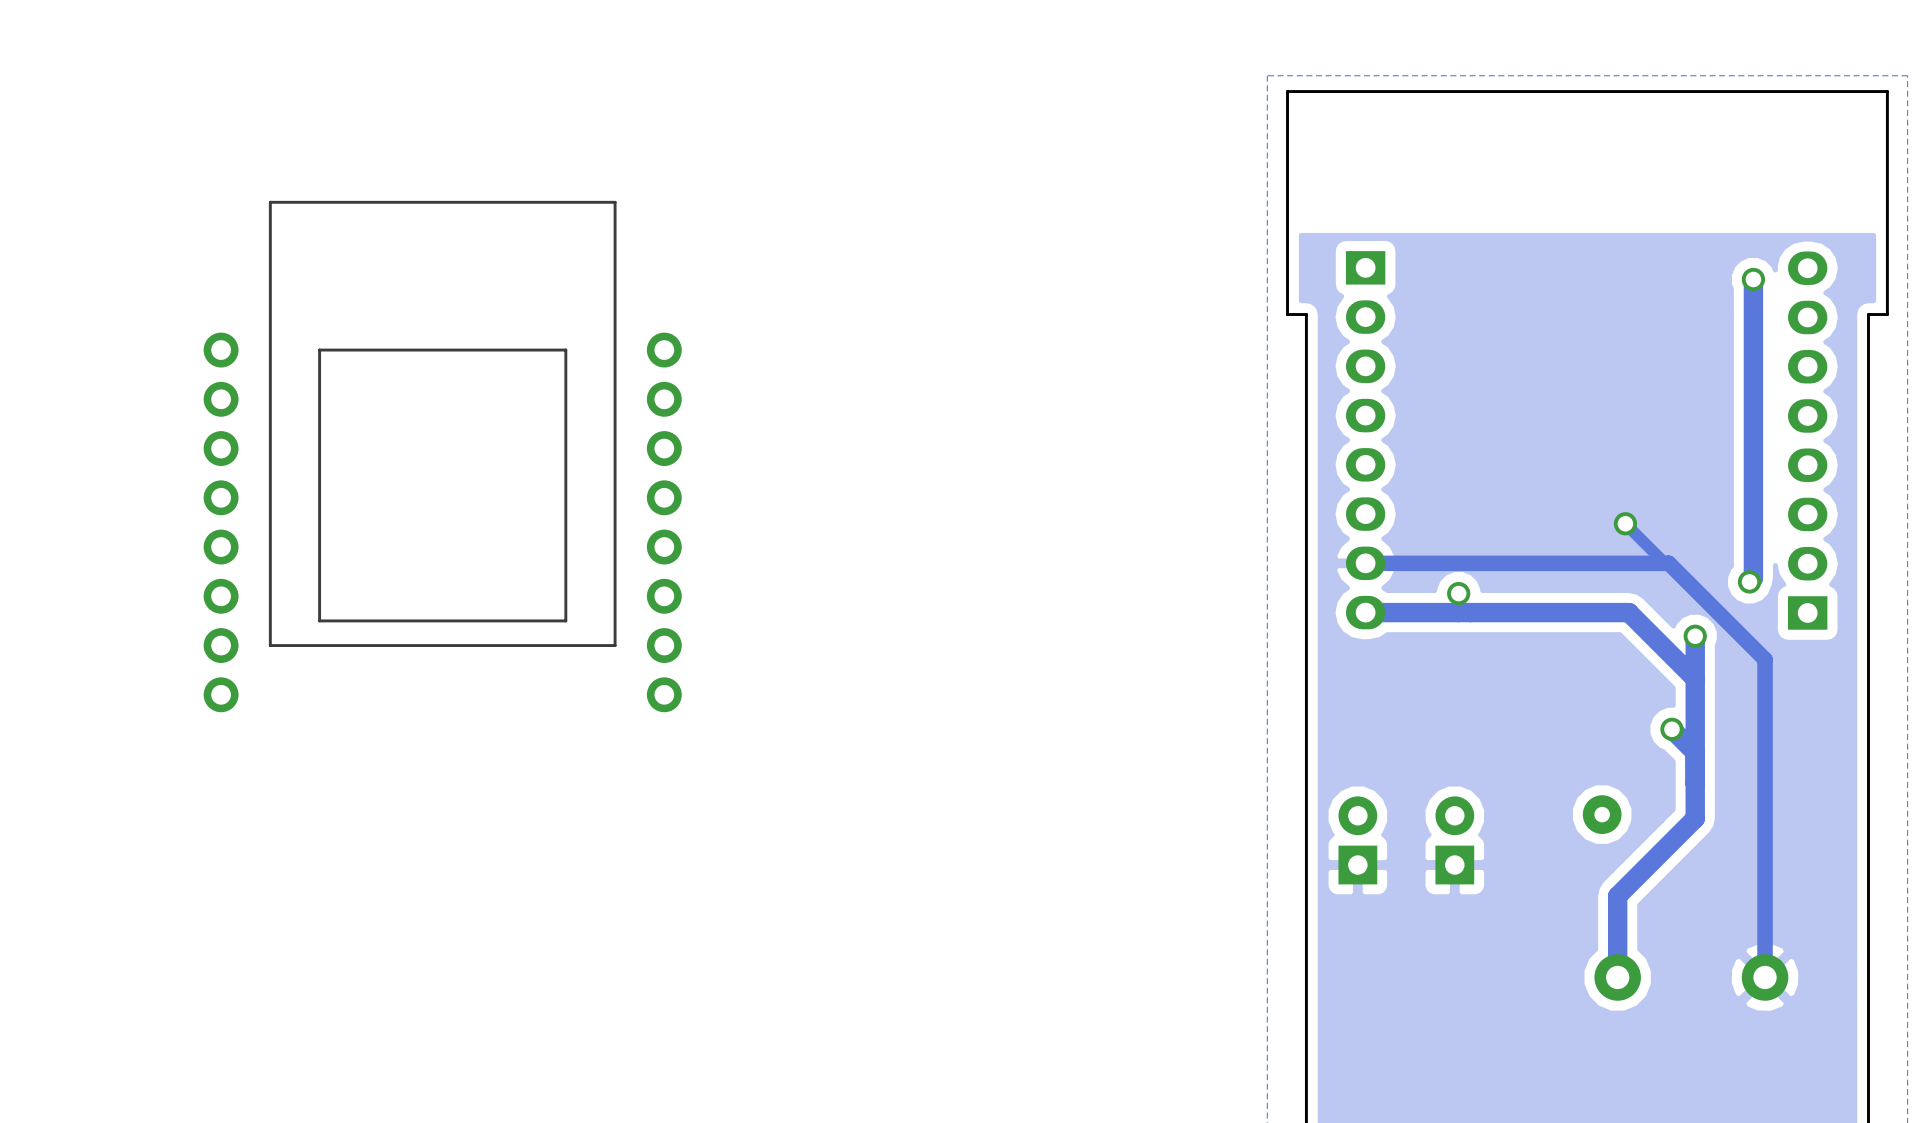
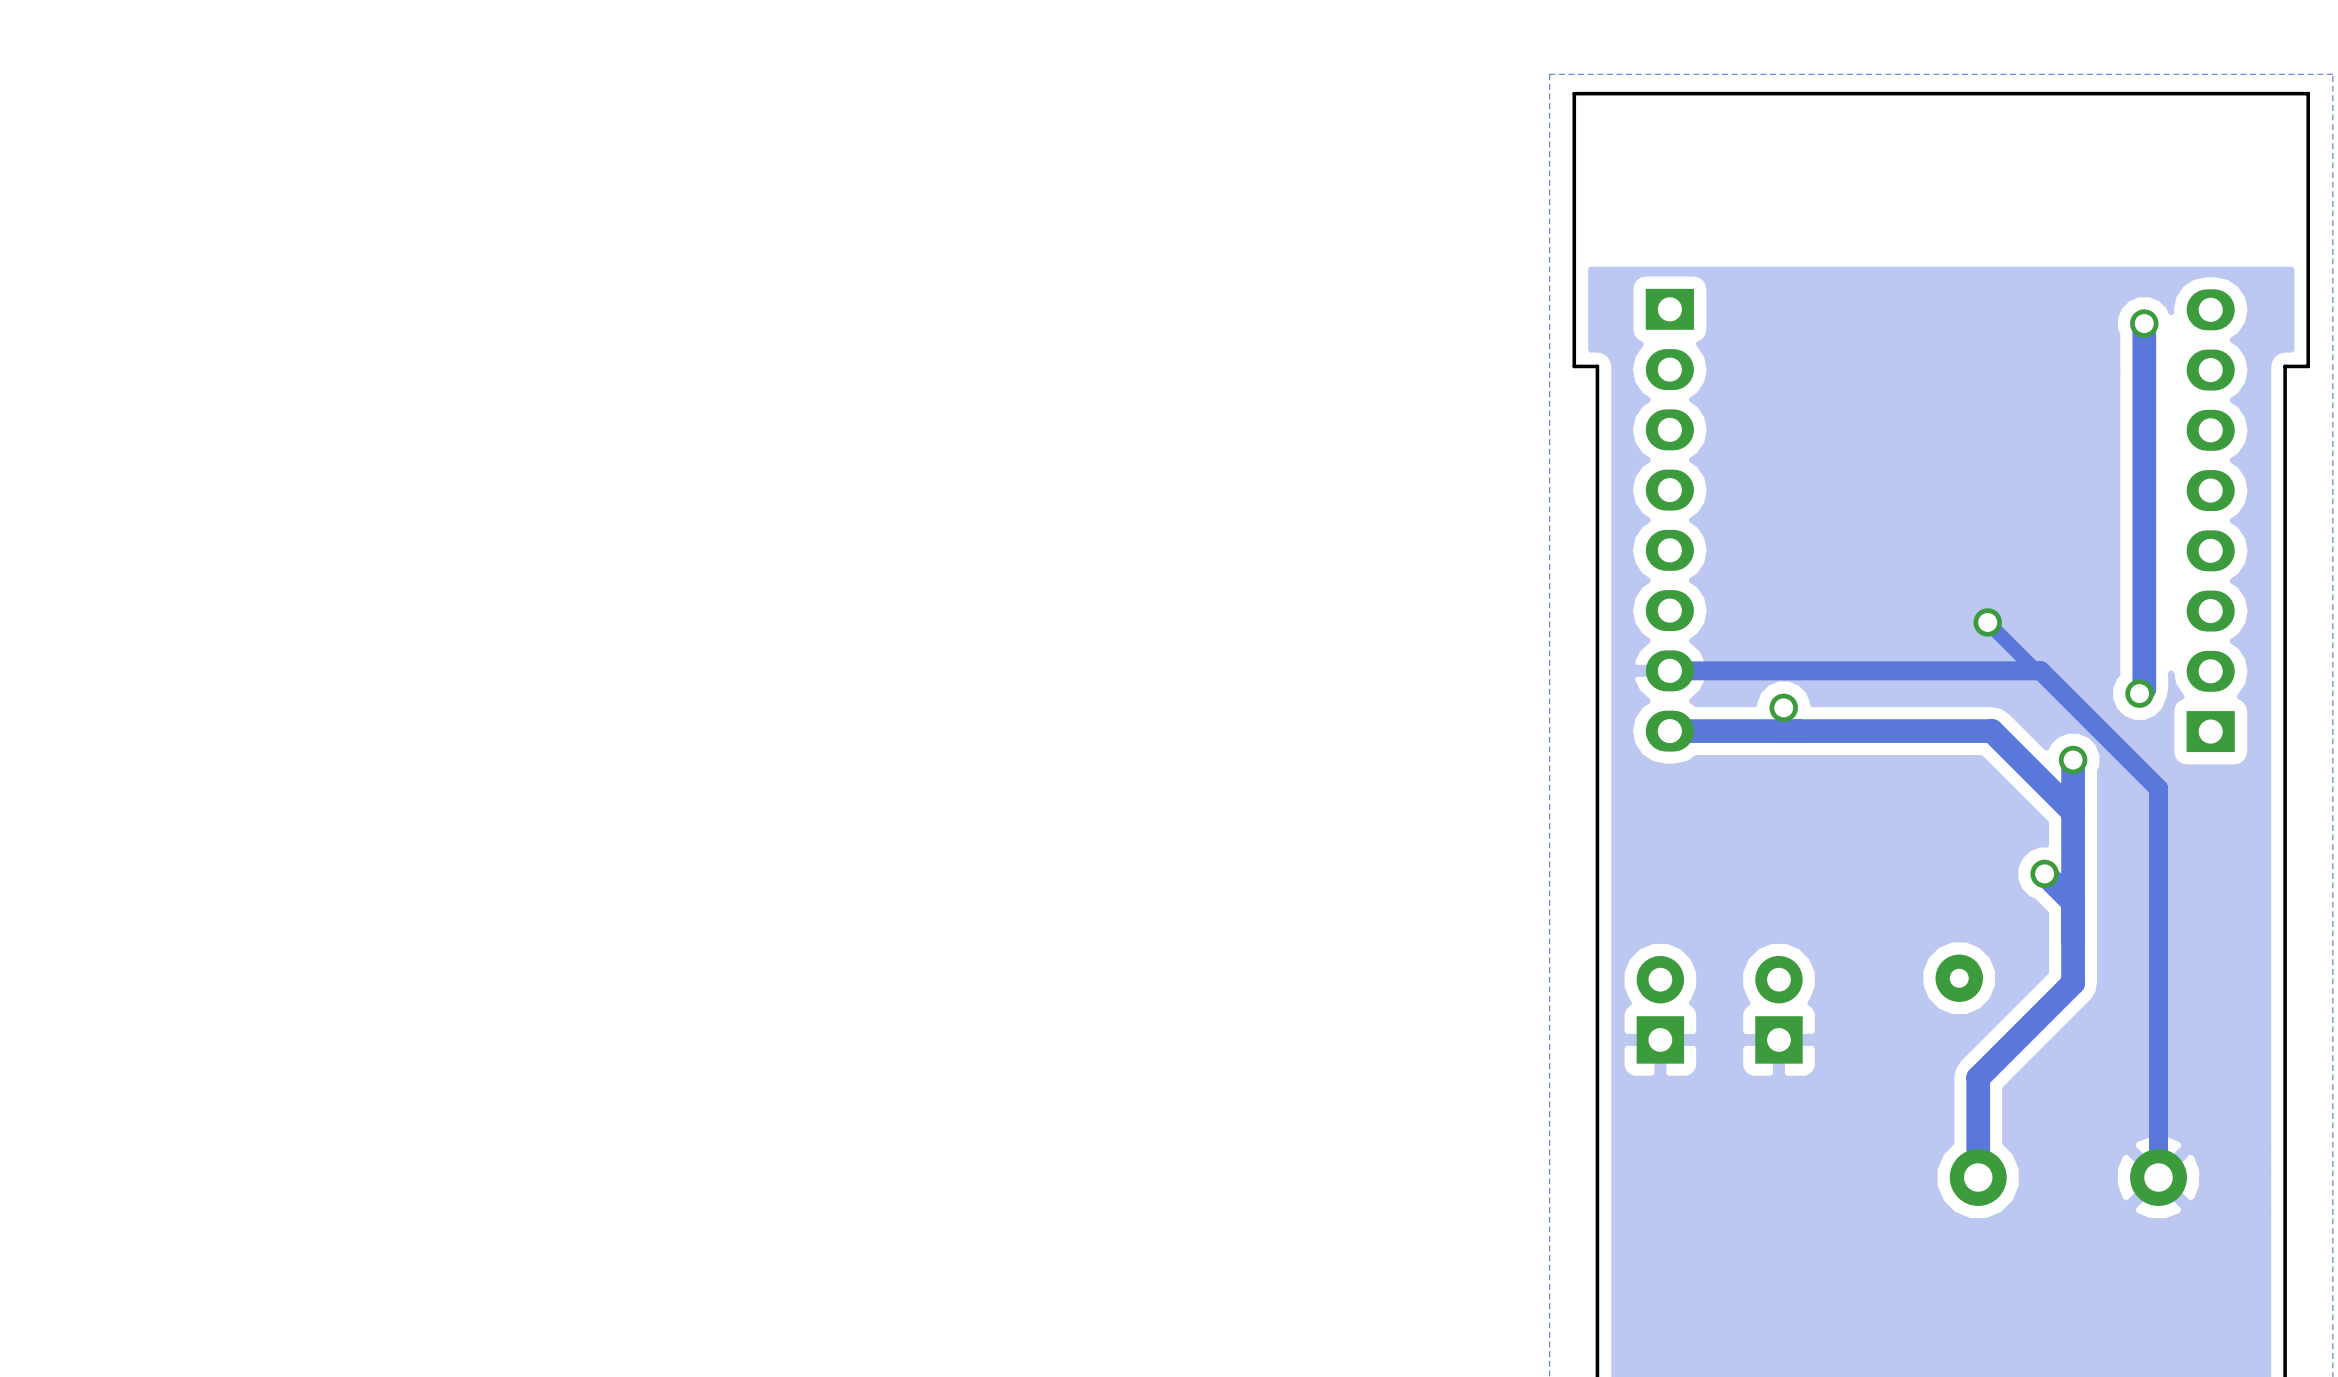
part: (442, 456) -> none

